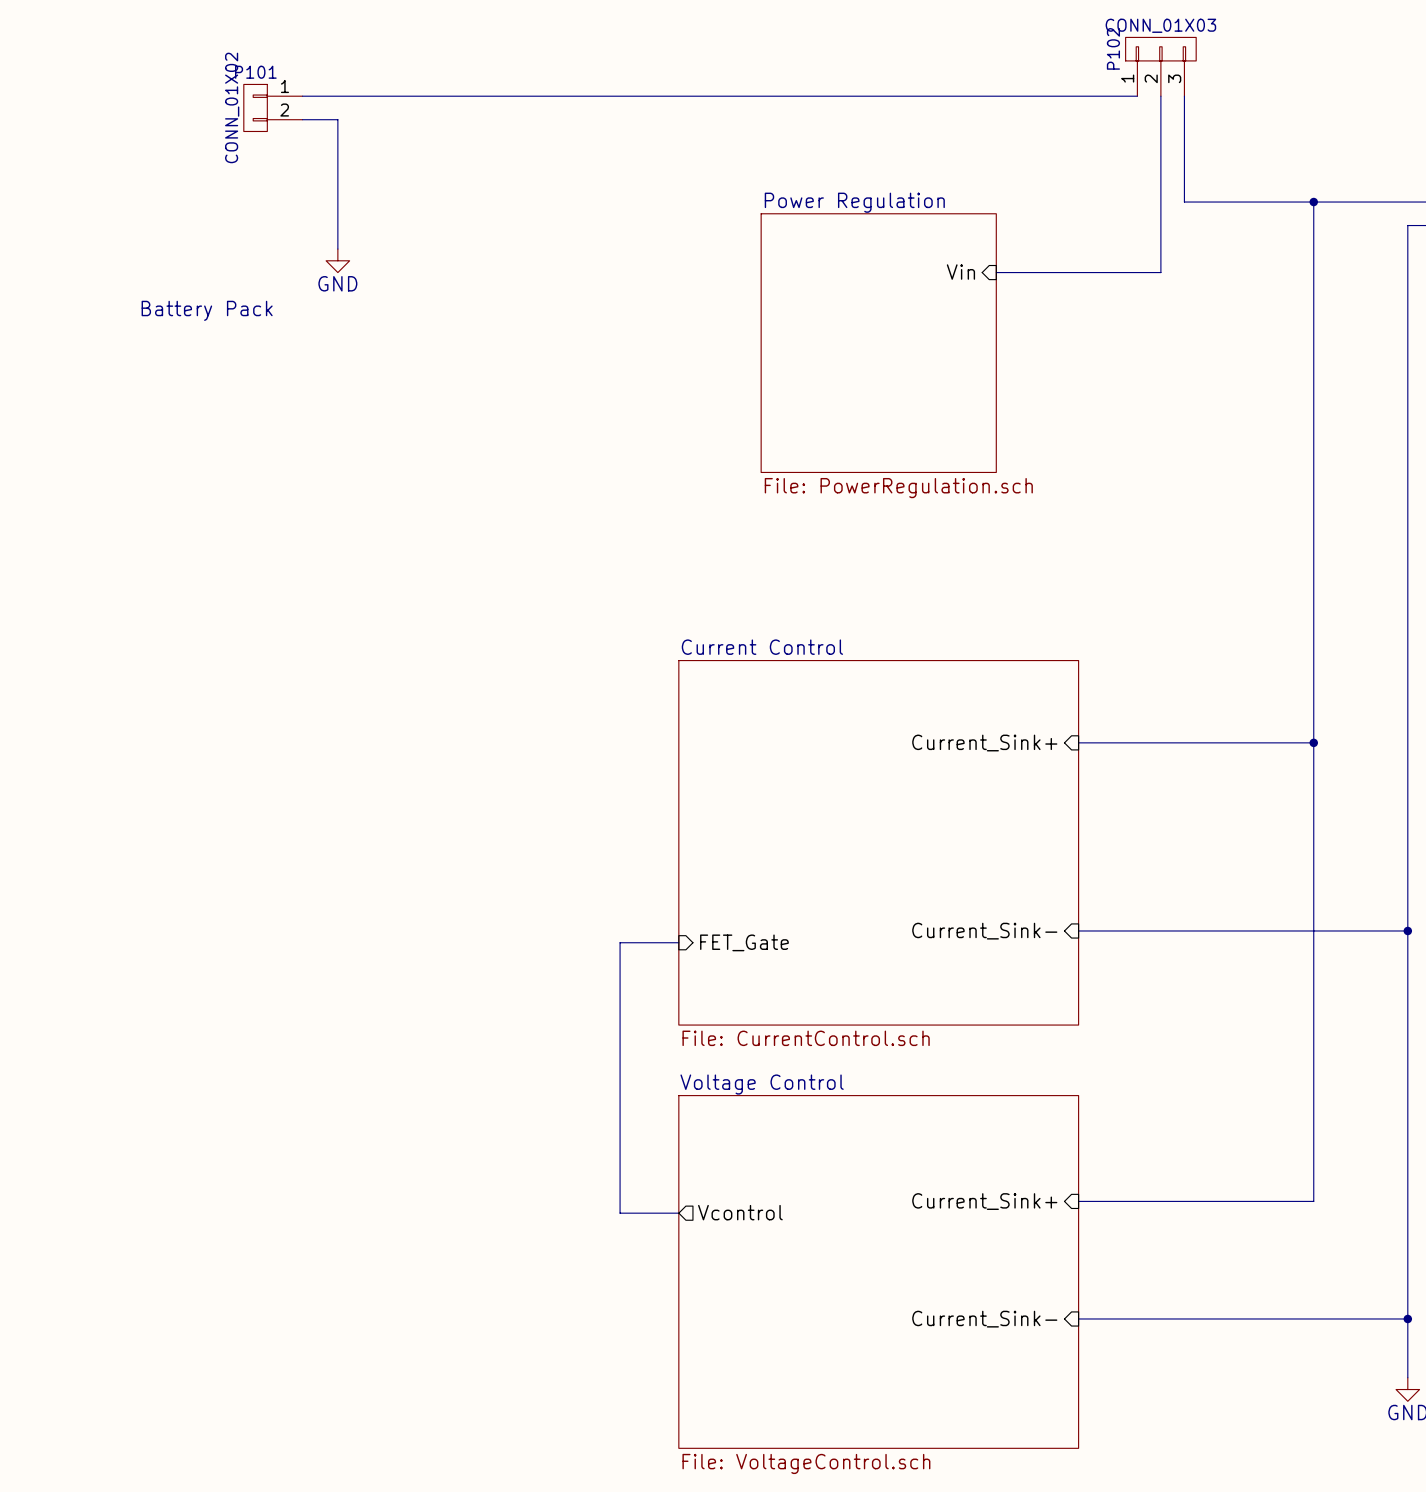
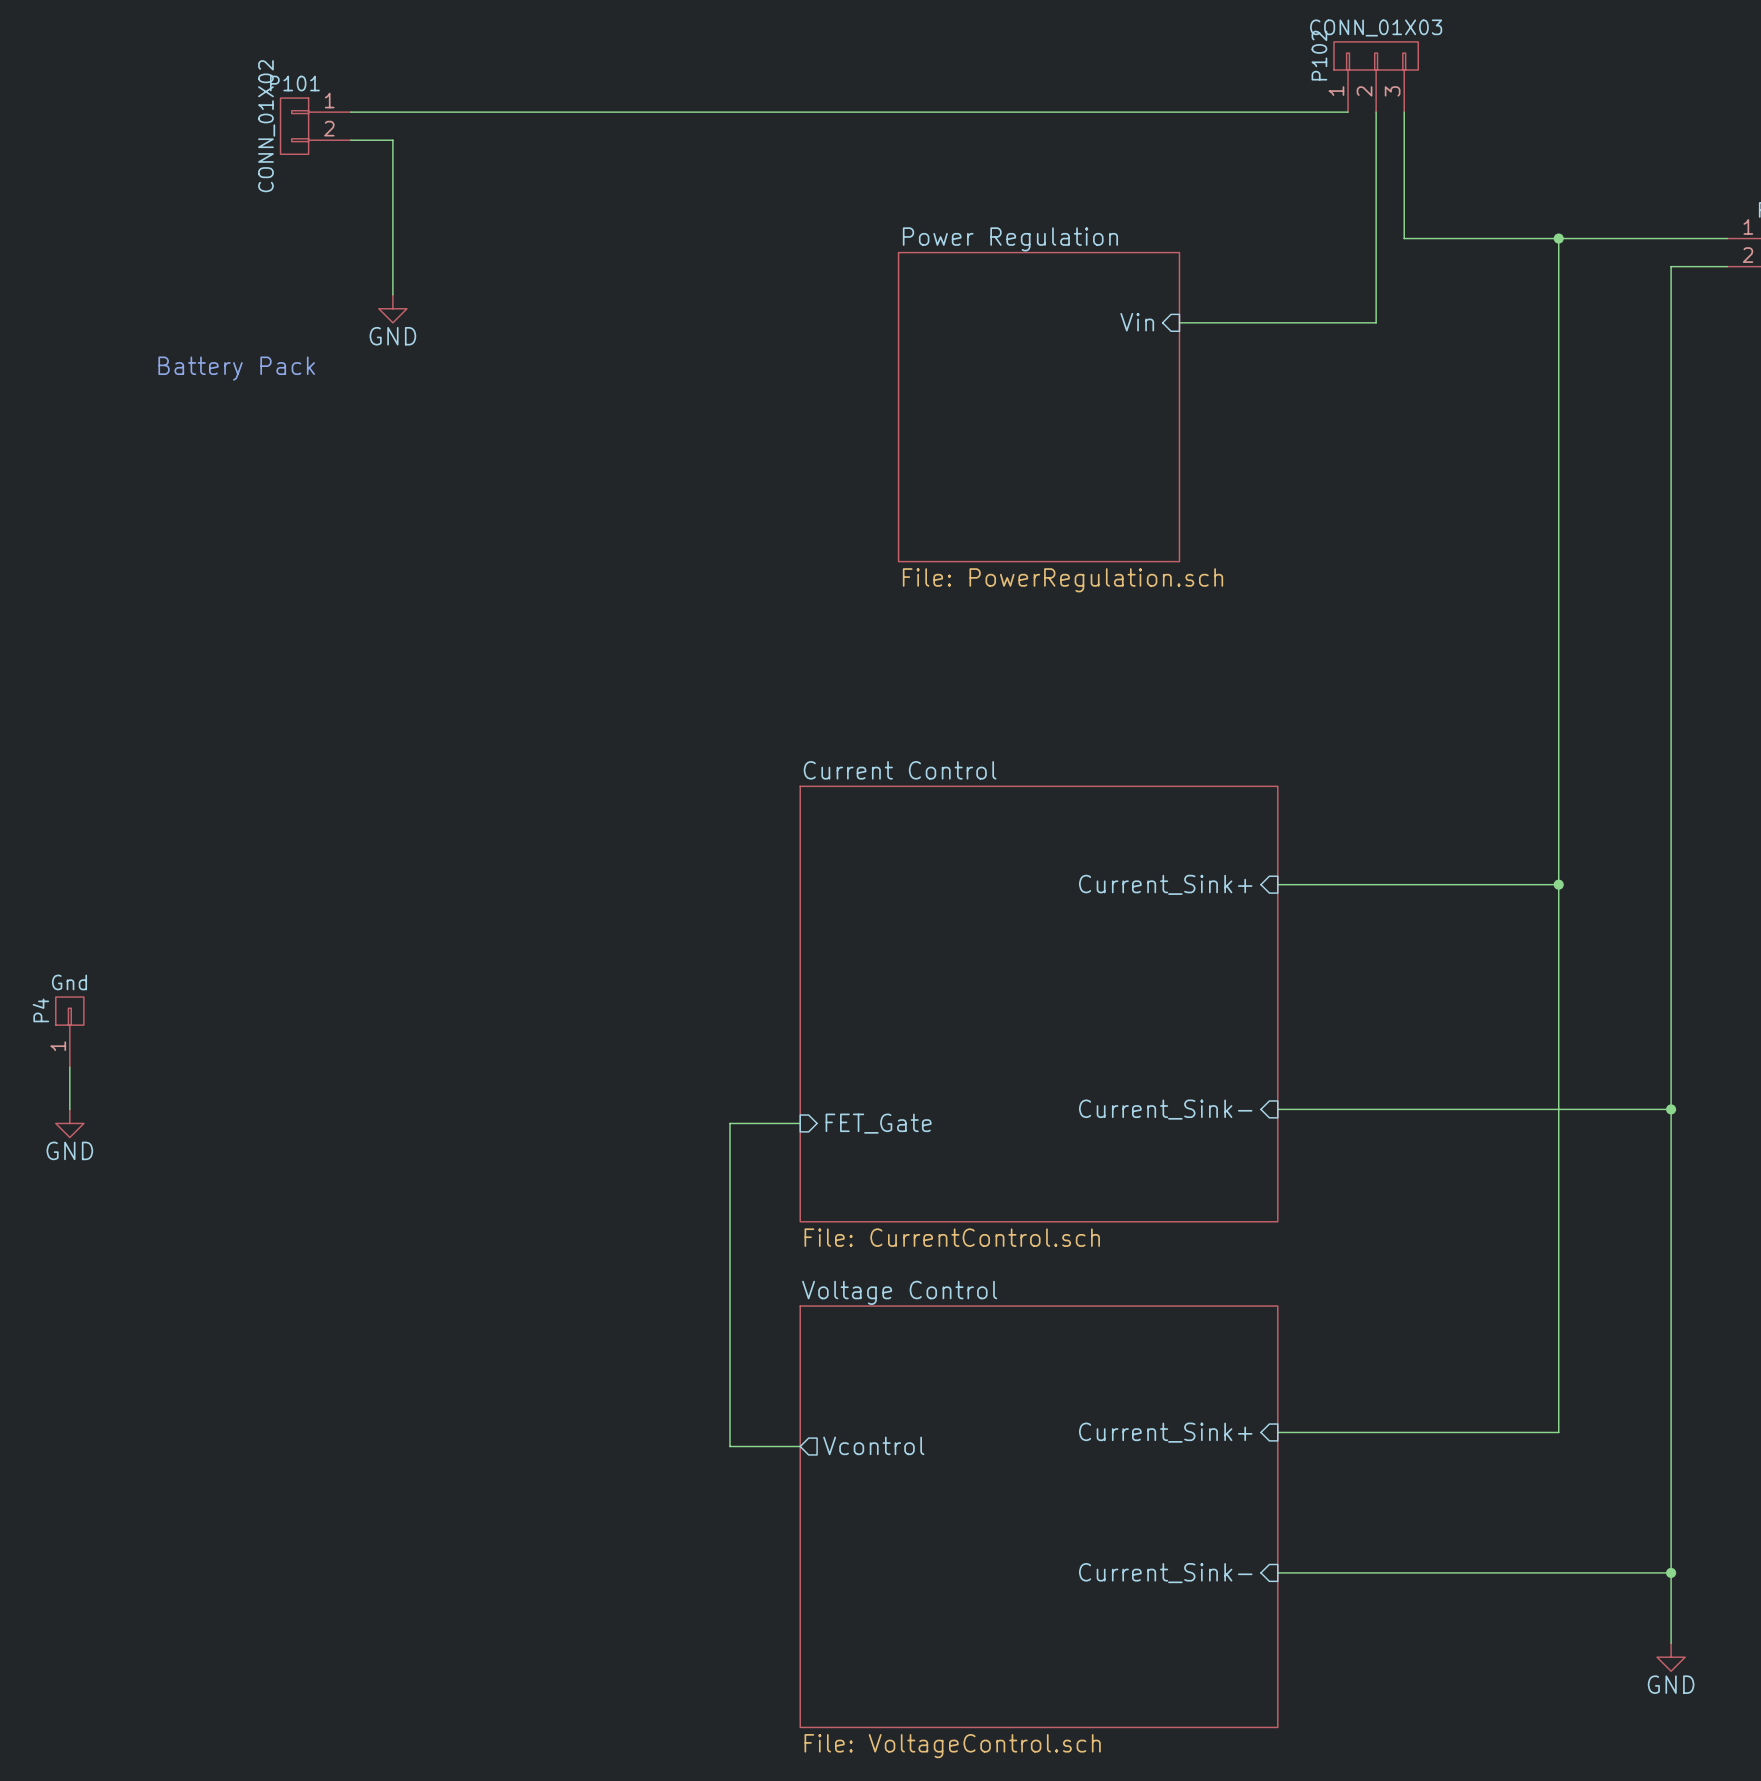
P4: none -> Gnd (69, 1032)
wire: none -> (69, 1067) (69, 1109)
power symbol: none -> GND (69, 1123)

